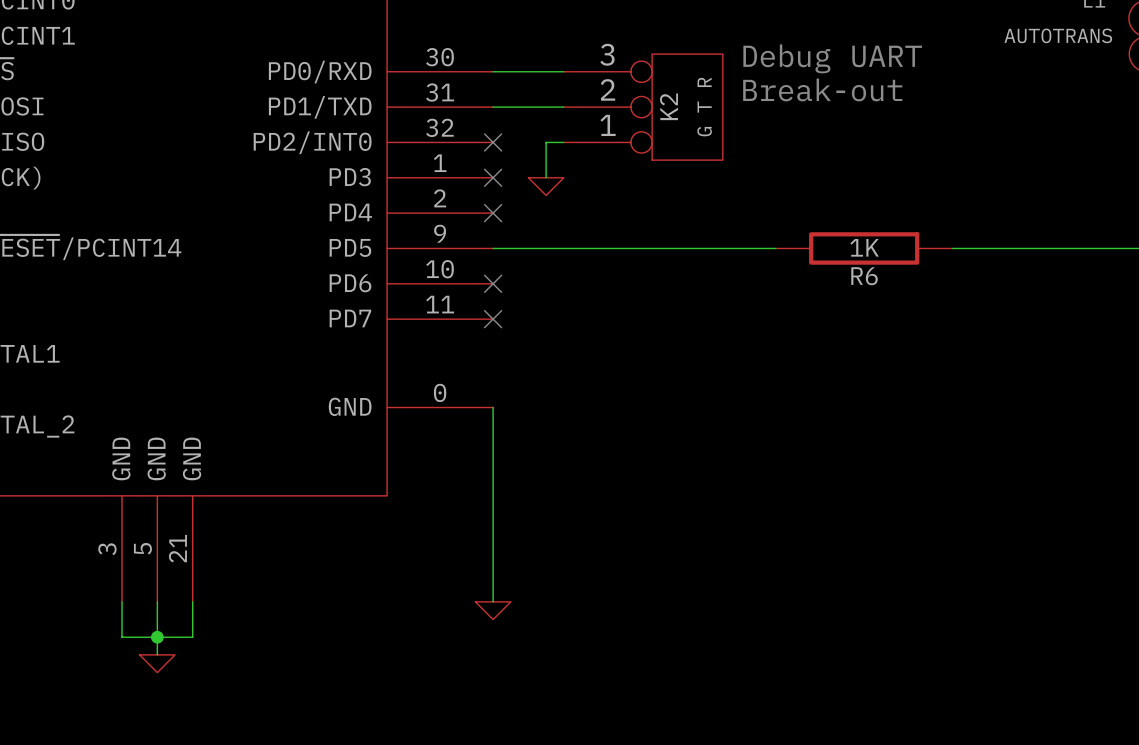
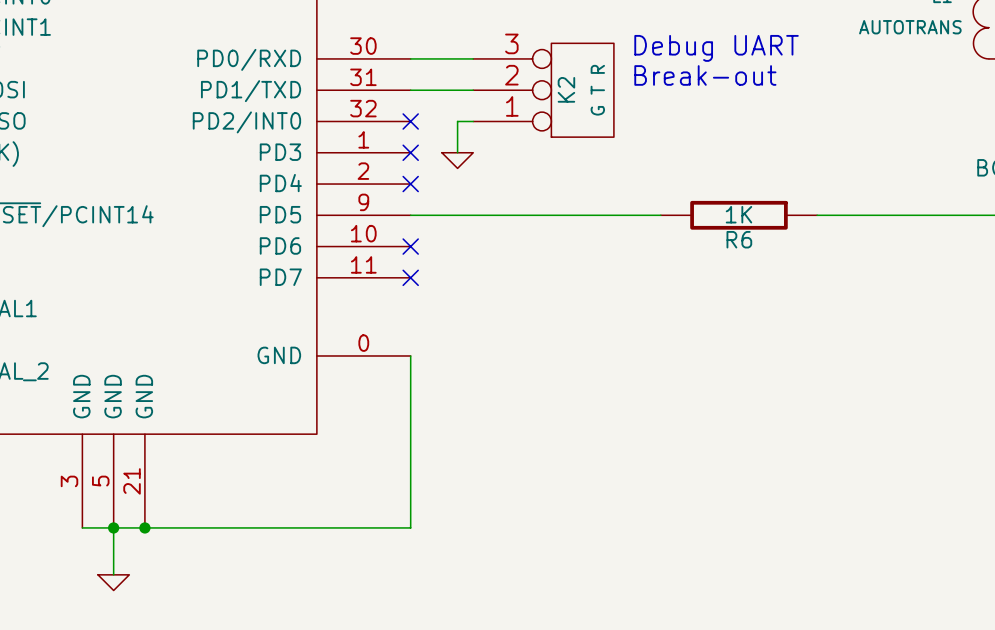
wire: (122, 601) (122, 637) (192, 637) (192, 601) -> (82, 527) (410, 527)
junction: none -> (113, 527)
junction: none -> (144, 527)
power symbol: (493, 610) -> none
junction: (157, 637) -> none

